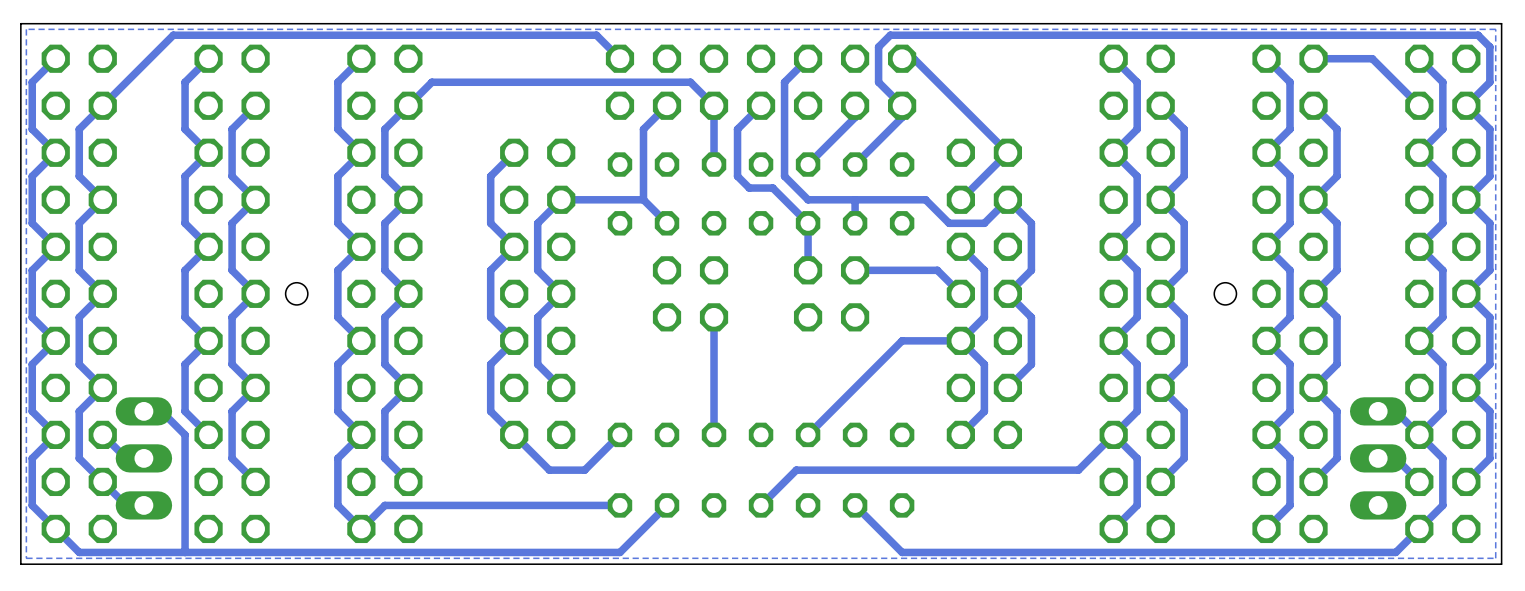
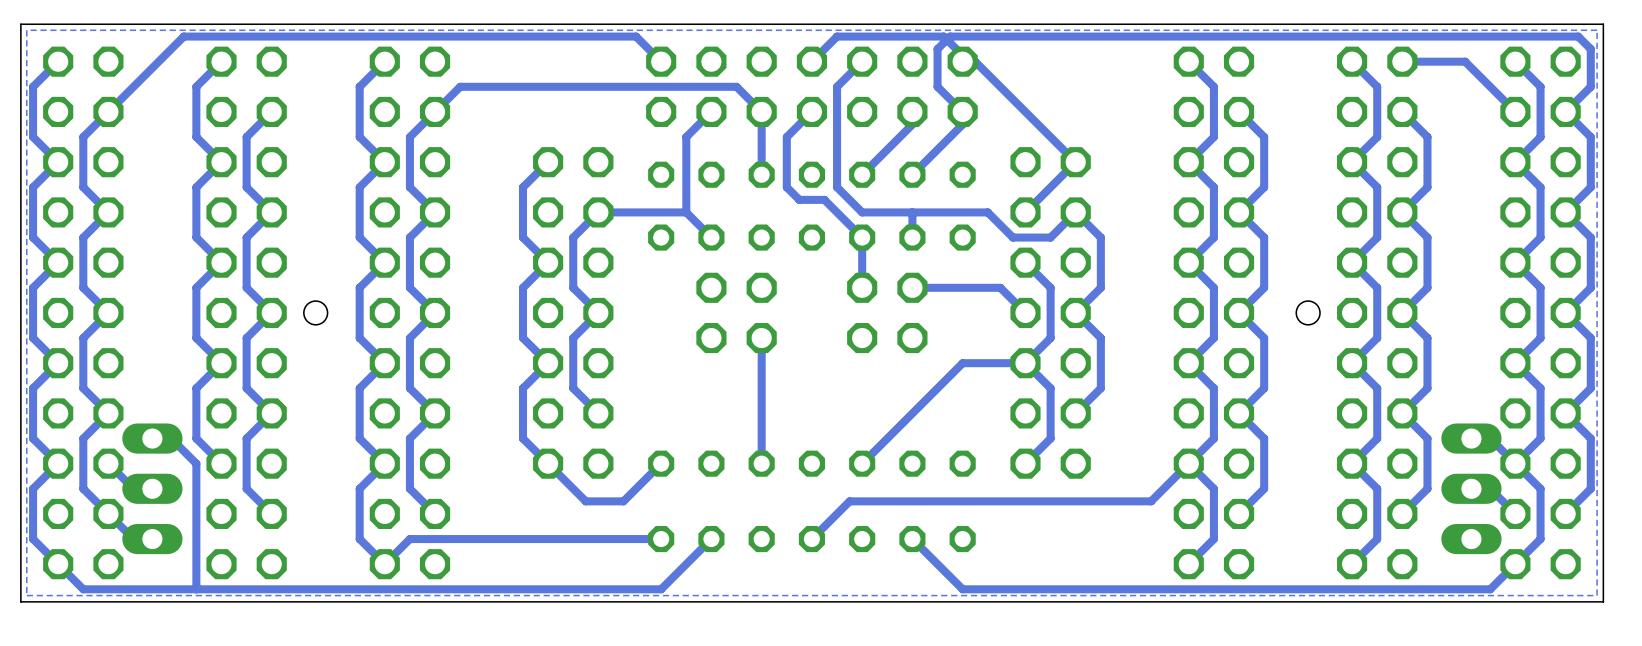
track: none -> (962, 61) (962, 55) (943, 36) (837, 36) (811, 61)

